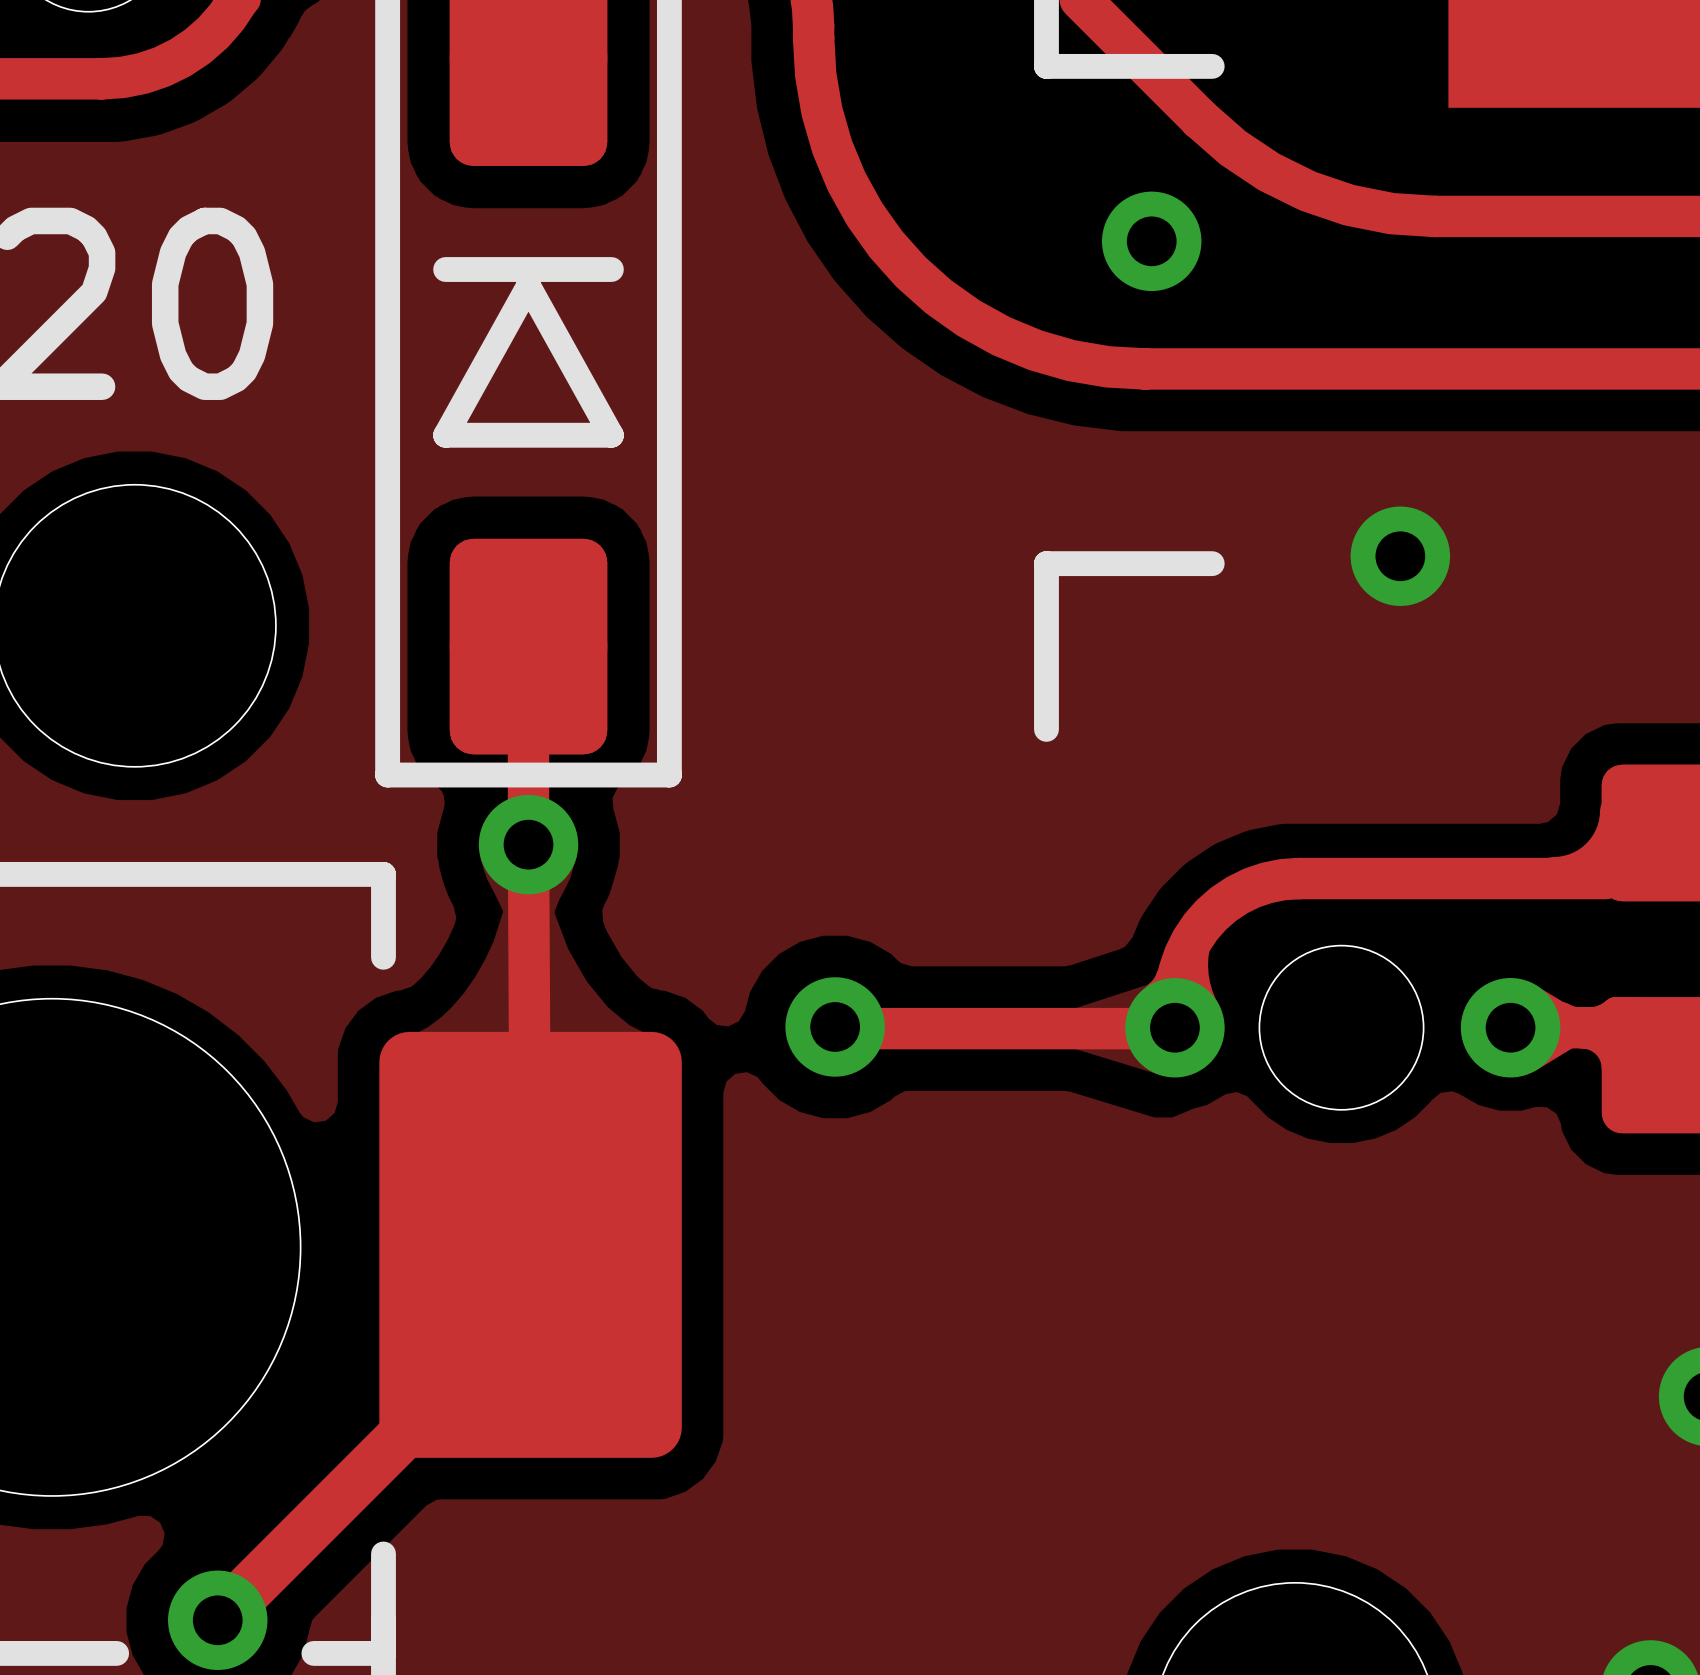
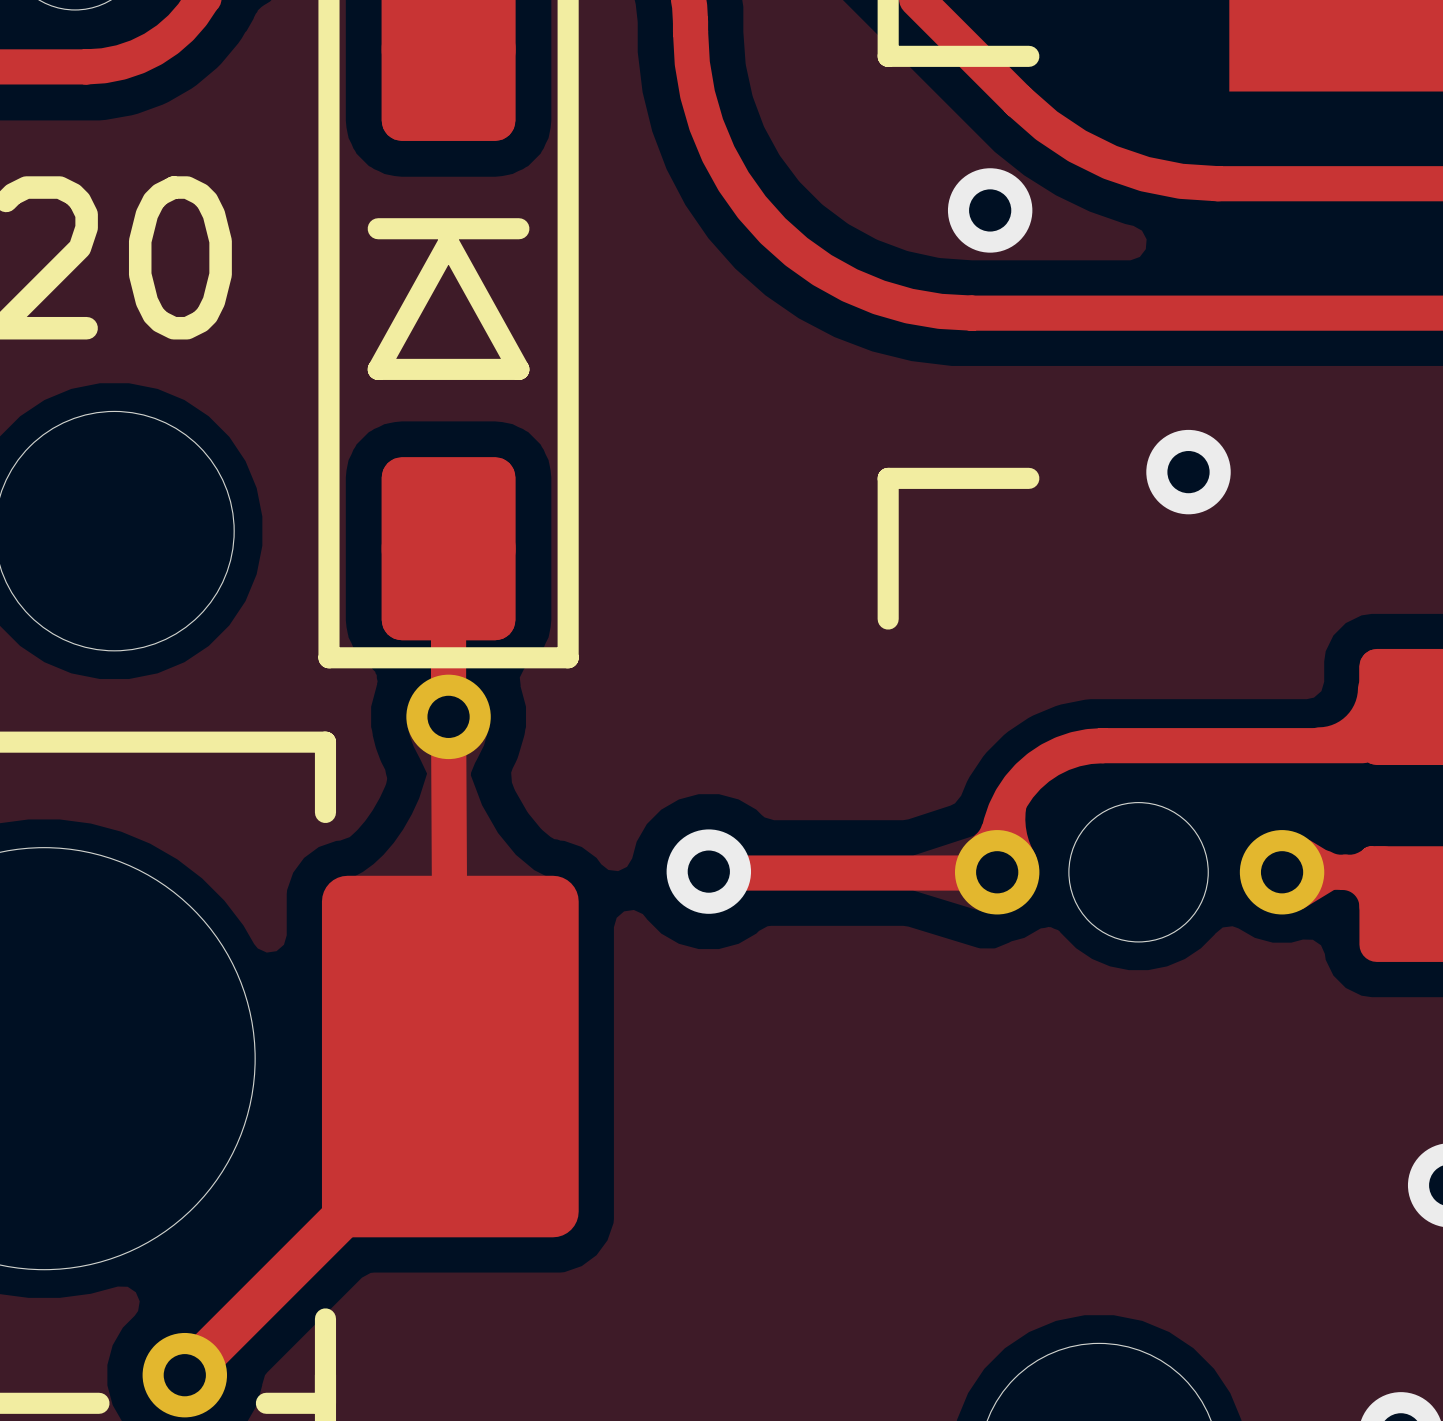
via position: (1151, 241) -> (990, 210)

